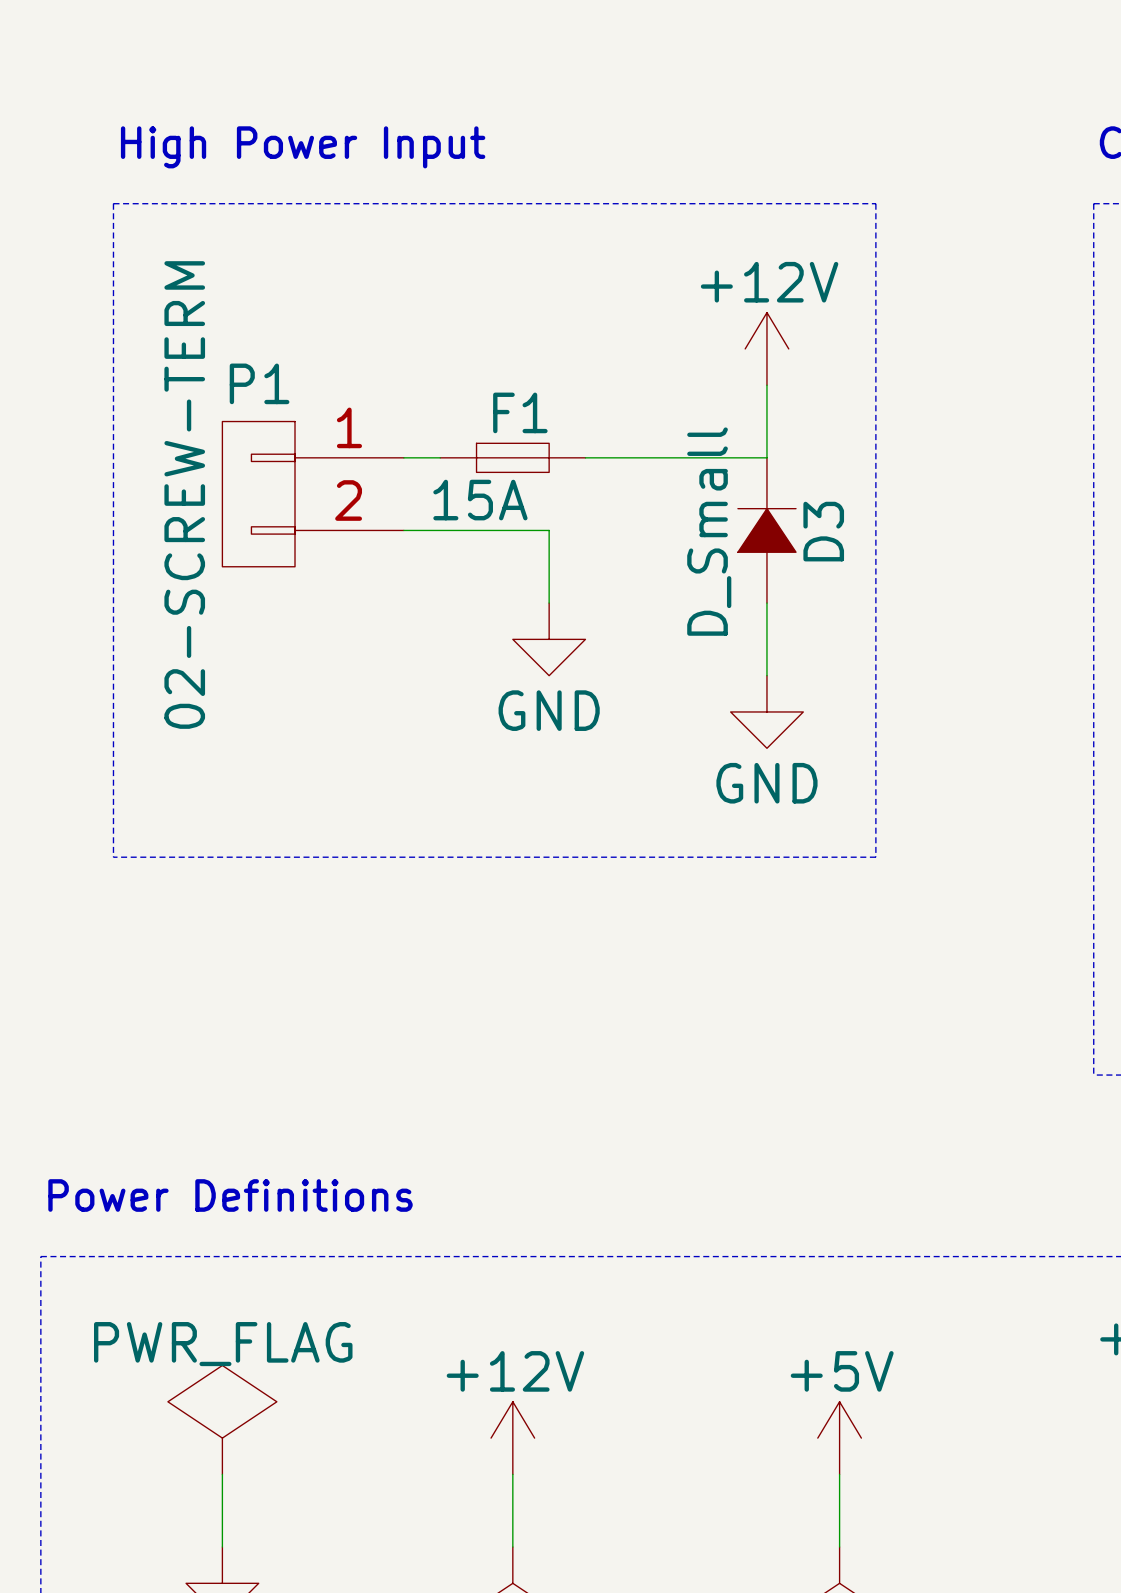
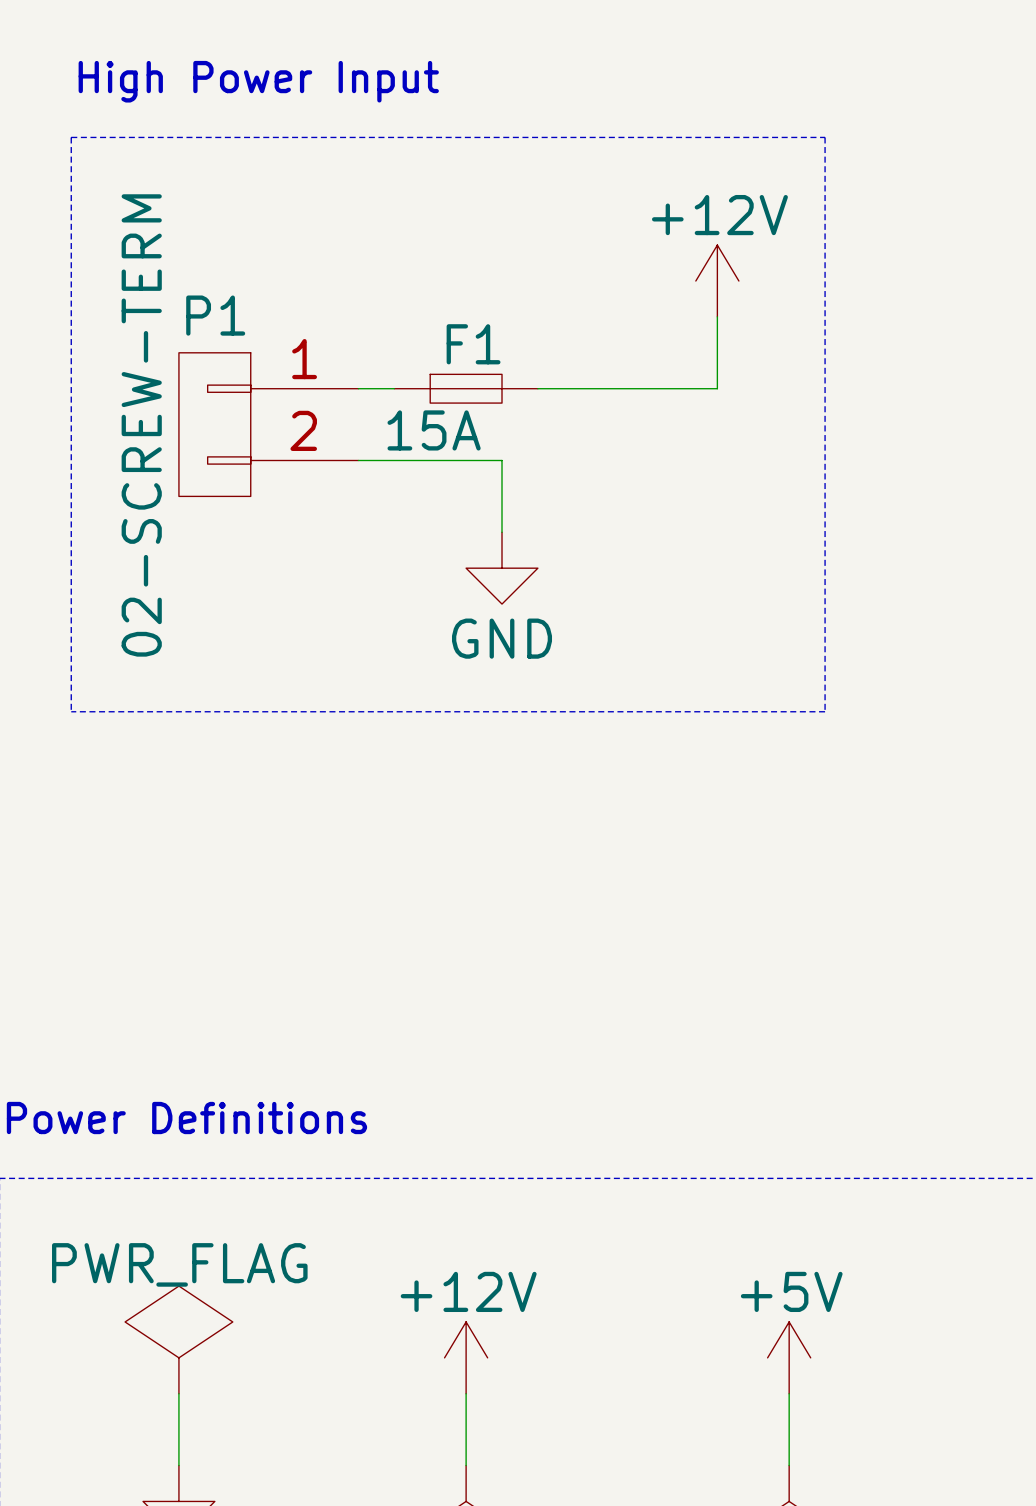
D3: D_Small (766, 530) -> none
wire: (766, 603) (766, 675) -> none
power symbol: GND (766, 711) -> none
line: (113, 784) (113, 857) (875, 857) (875, 784) -> (71, 711) (825, 711)

